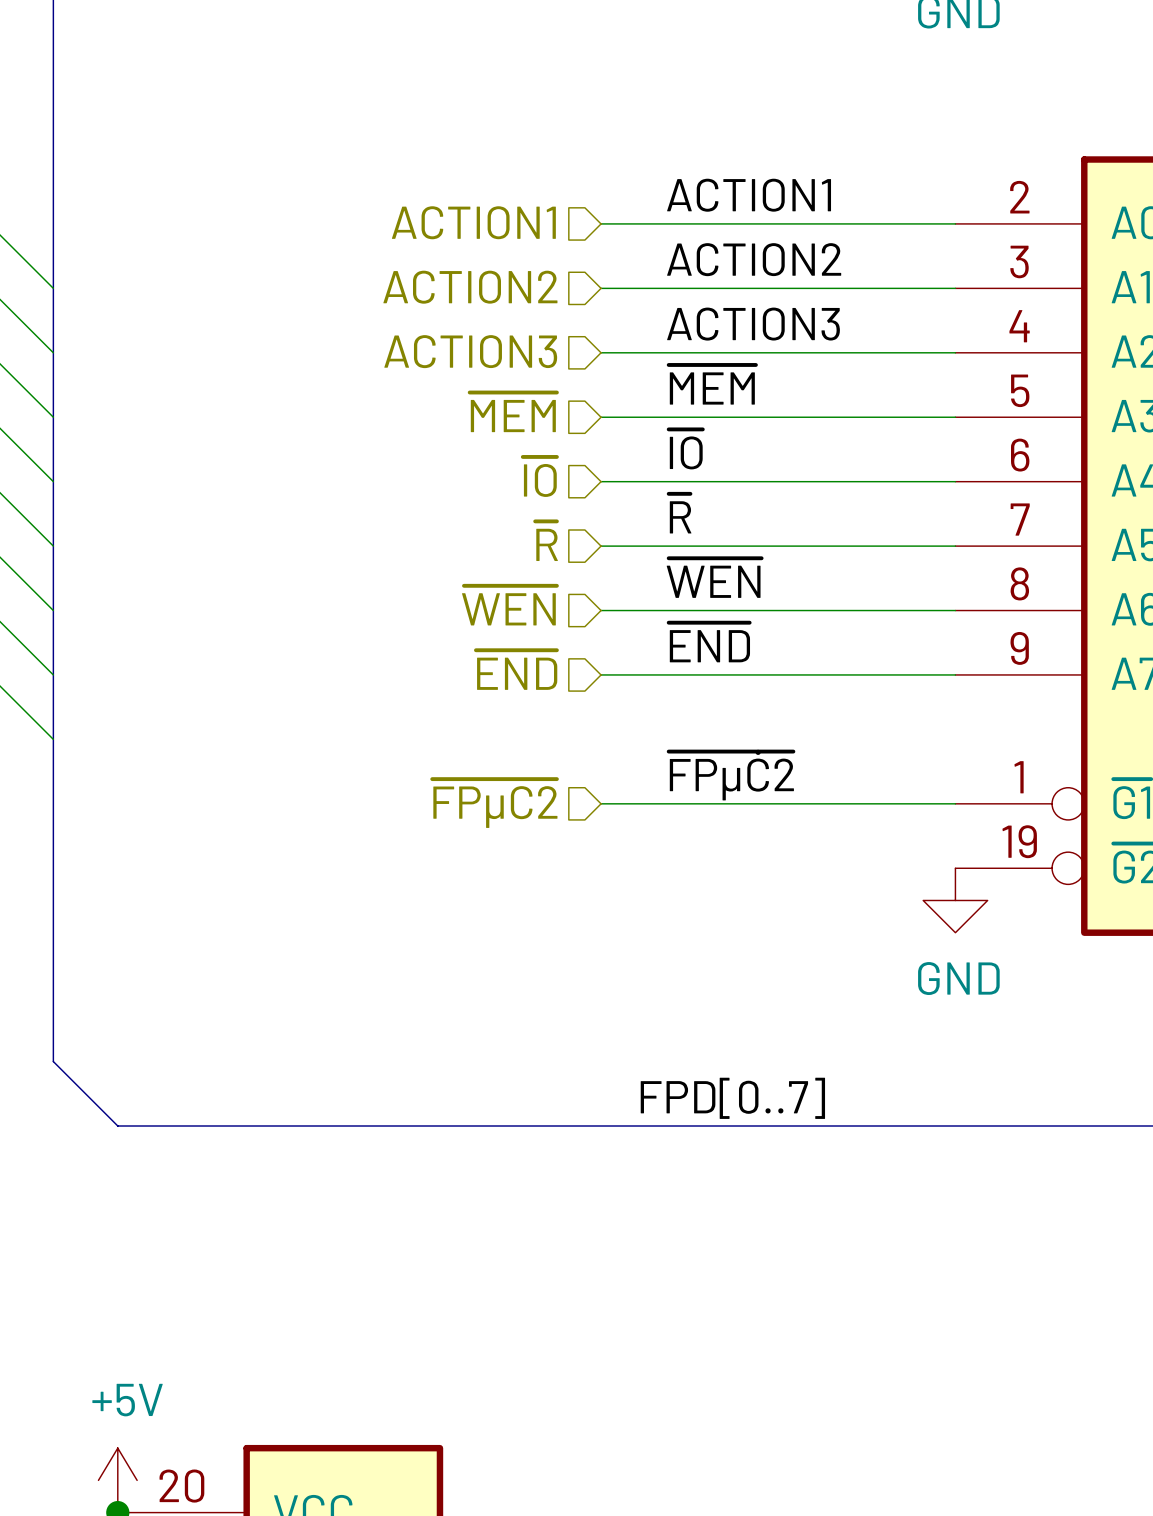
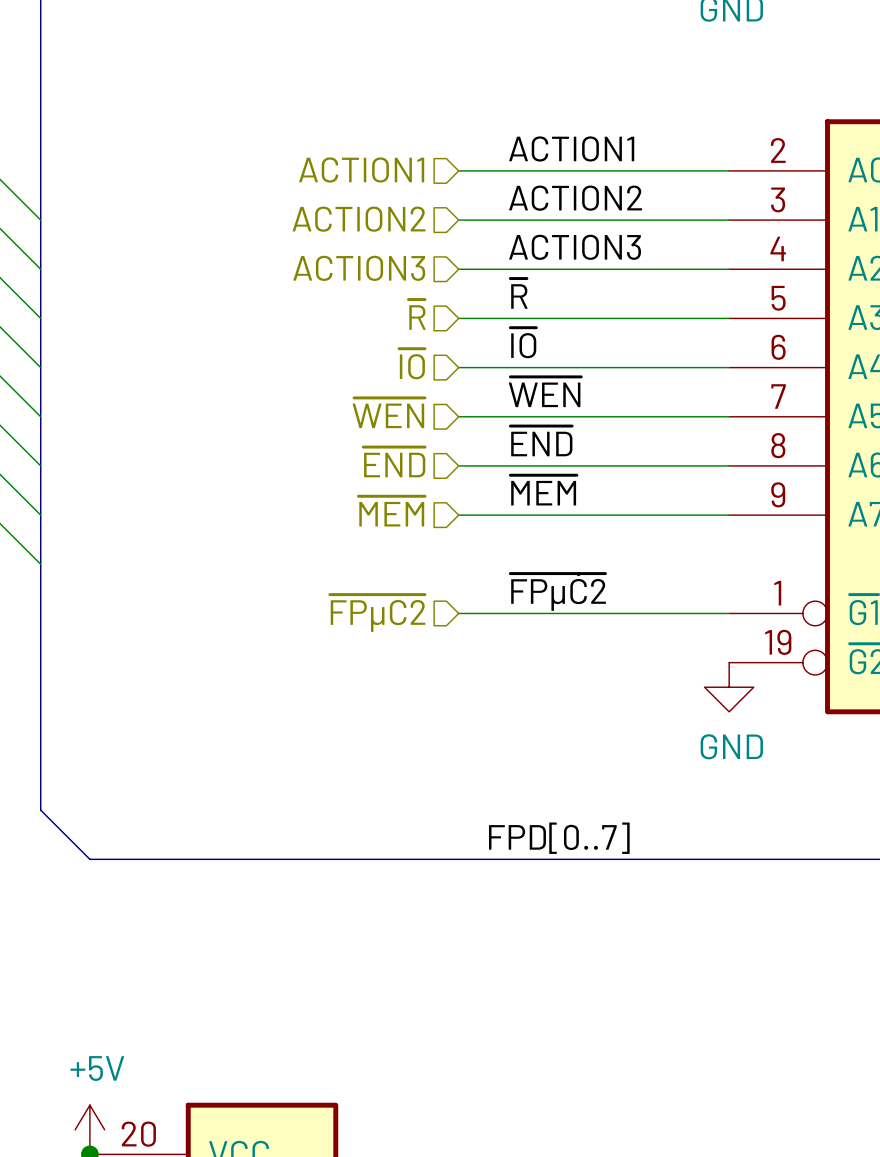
label: ~{MEM} (712, 384) -> ~{R} (518, 293)
hierarchical label: ~{MEM} (513, 412) -> ~{R} (417, 314)
label: ~{R} (680, 513) -> ~{WEN} (545, 392)
hierarchical label: ~{R} (546, 541) -> ~{WEN} (388, 413)
label: ~{WEN} (714, 578) -> ~{END} (541, 441)
hierarchical label: ~{WEN} (509, 605) -> ~{END} (394, 462)
label: ~{END} (709, 642) -> ~{MEM} (543, 490)
hierarchical label: ~{END} (516, 670) -> ~{MEM} (391, 511)

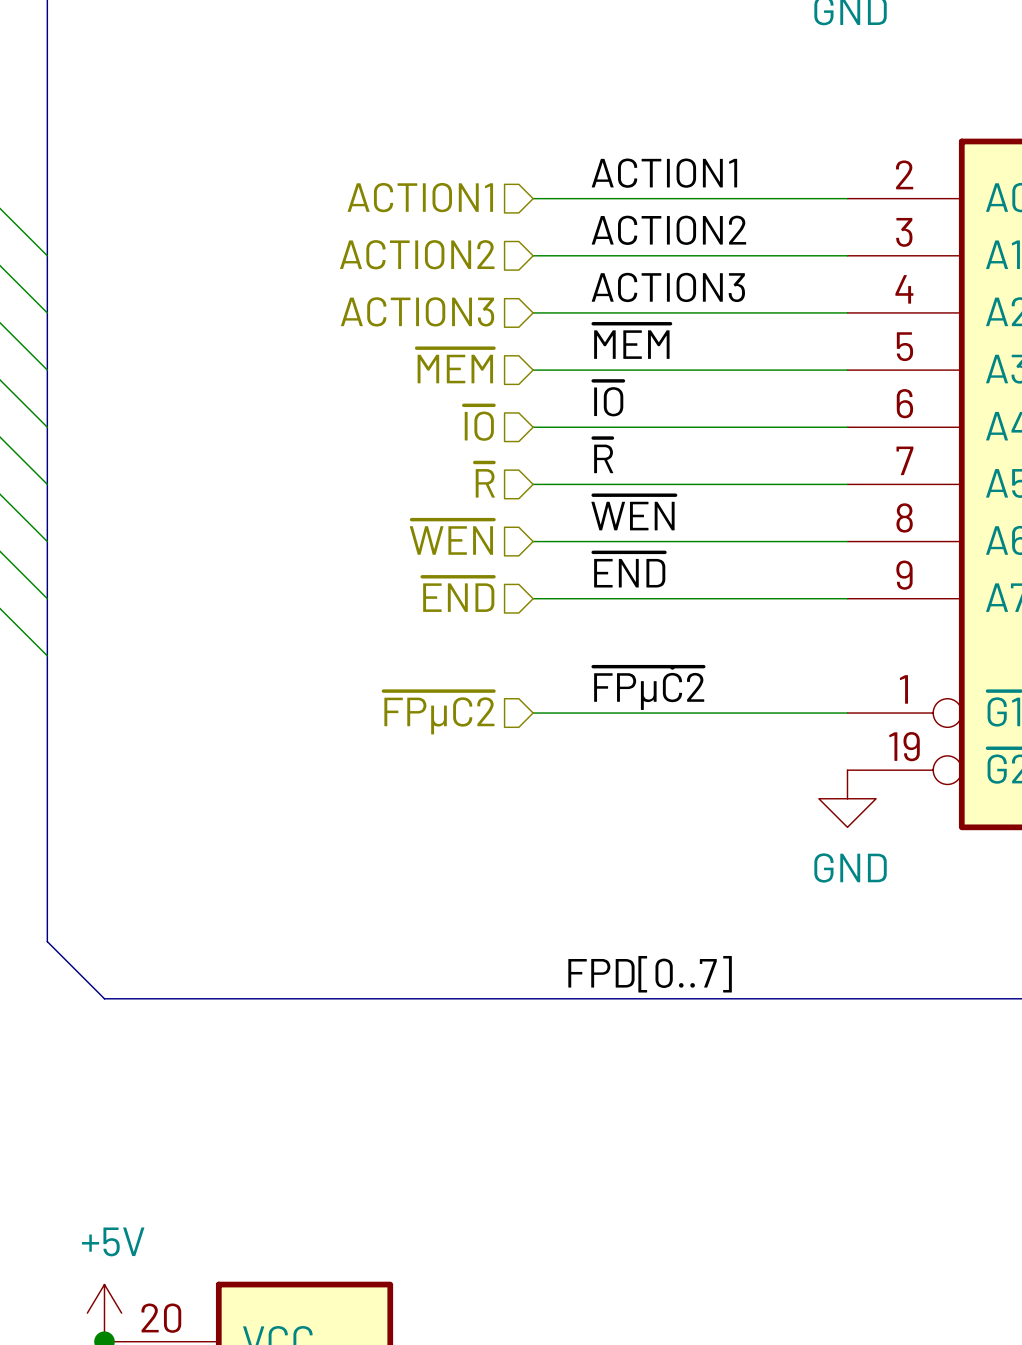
label: ~{R} (518, 293) -> ~{MEM} (631, 341)
hierarchical label: ~{R} (417, 314) -> ~{MEM} (455, 365)
label: ~{WEN} (545, 392) -> ~{R} (603, 455)
hierarchical label: ~{WEN} (388, 413) -> ~{R} (484, 480)
label: ~{END} (541, 441) -> ~{WEN} (633, 512)
hierarchical label: ~{END} (394, 462) -> ~{WEN} (451, 537)
label: ~{MEM} (543, 490) -> ~{END} (629, 569)
hierarchical label: ~{MEM} (391, 511) -> ~{END} (458, 594)

